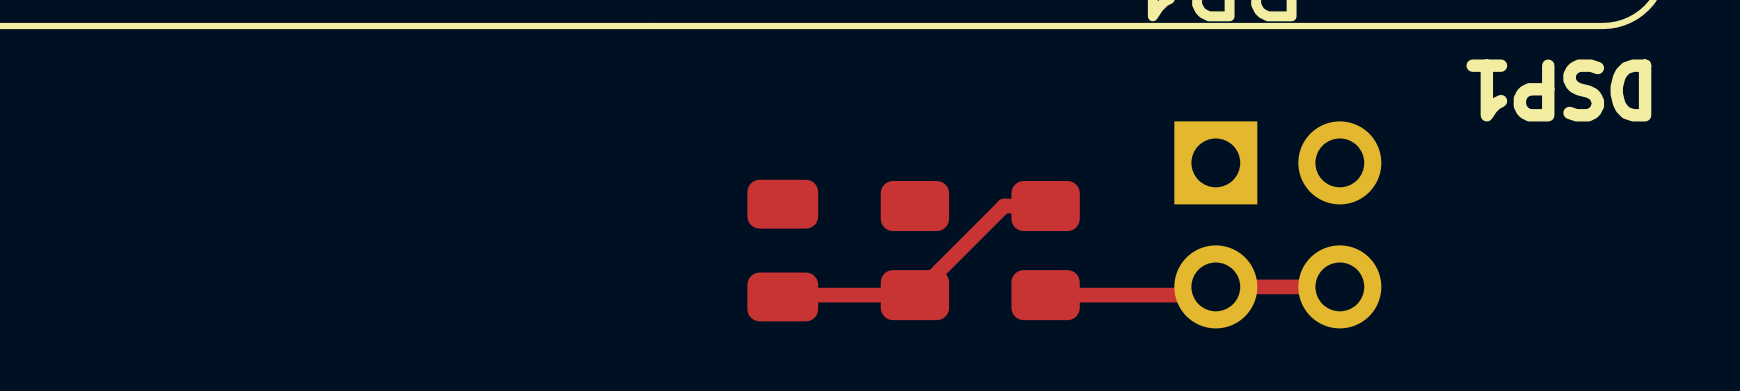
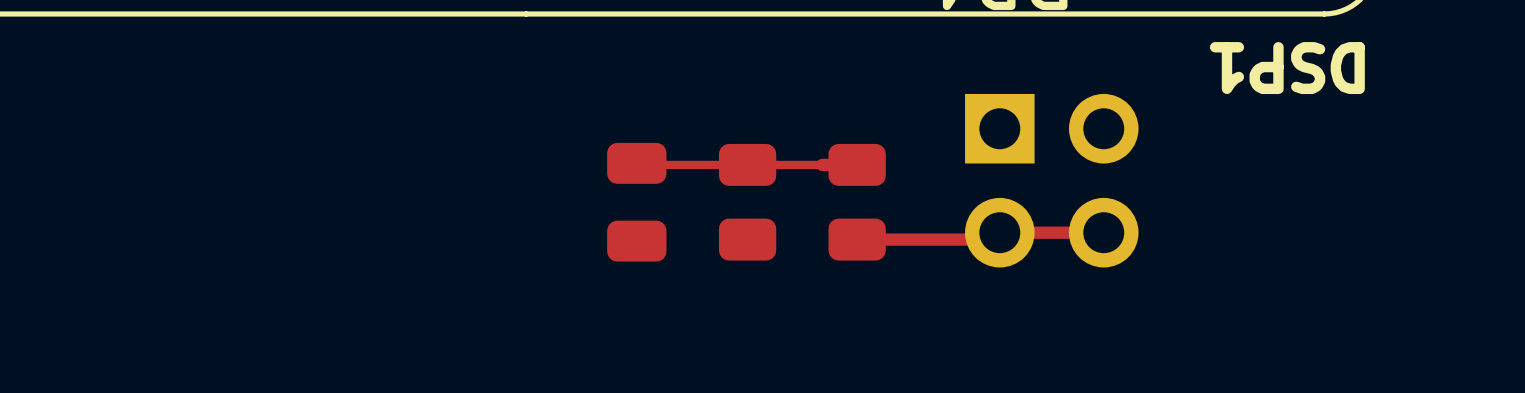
top track: (1004, 206) (914, 295) (784, 295) -> (822, 164) (638, 164) (636, 163)

